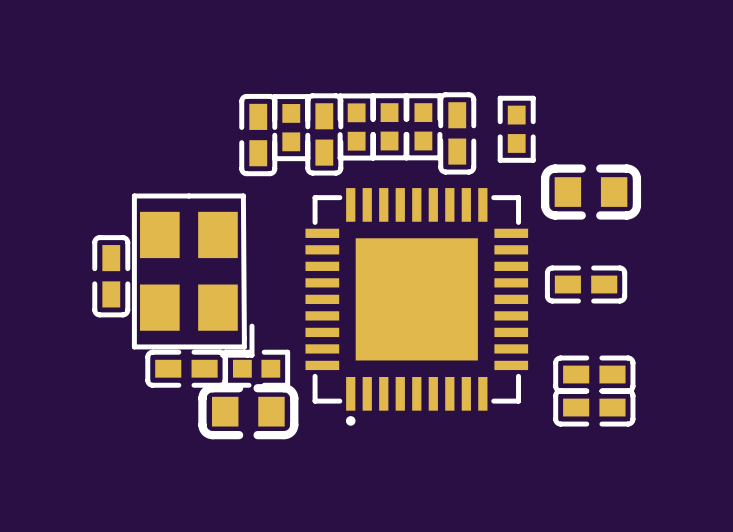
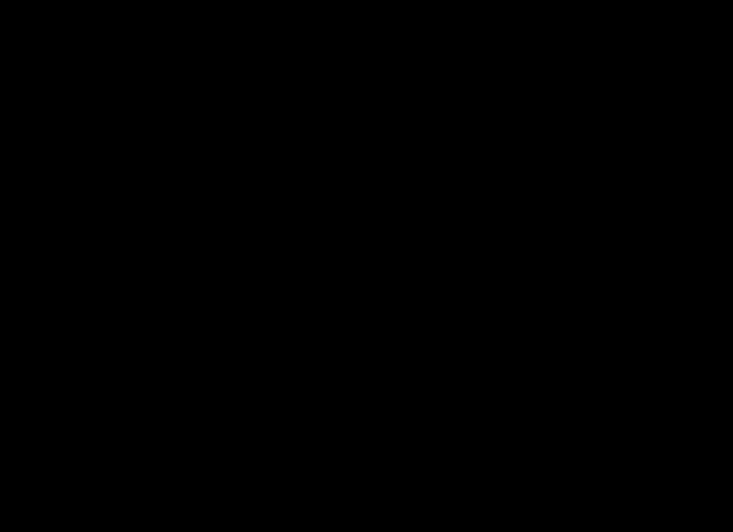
part: (389, 126) -> none
part: (423, 126) -> none
part: (291, 127) -> none
part: (356, 127) -> none
part: (516, 129) -> none
part: (457, 133) -> none
part: (324, 134) -> none
part: (258, 135) -> none
part: (591, 192) -> none
part: (193, 275) -> none
part: (111, 276) -> none
part: (586, 284) -> none
part: (416, 306) -> none
part: (186, 368) -> none
part: (256, 368) -> none
part: (594, 374) -> none
part: (594, 407) -> none
part: (248, 411) -> none

